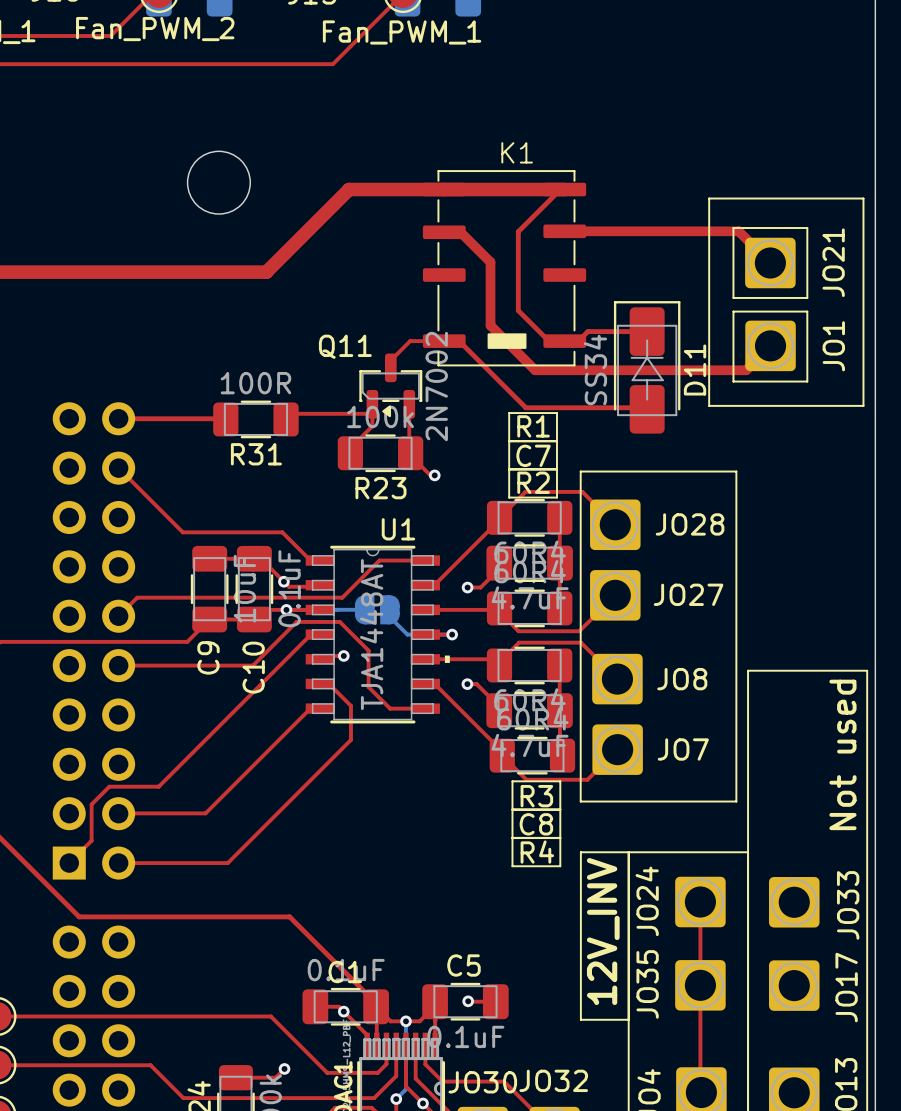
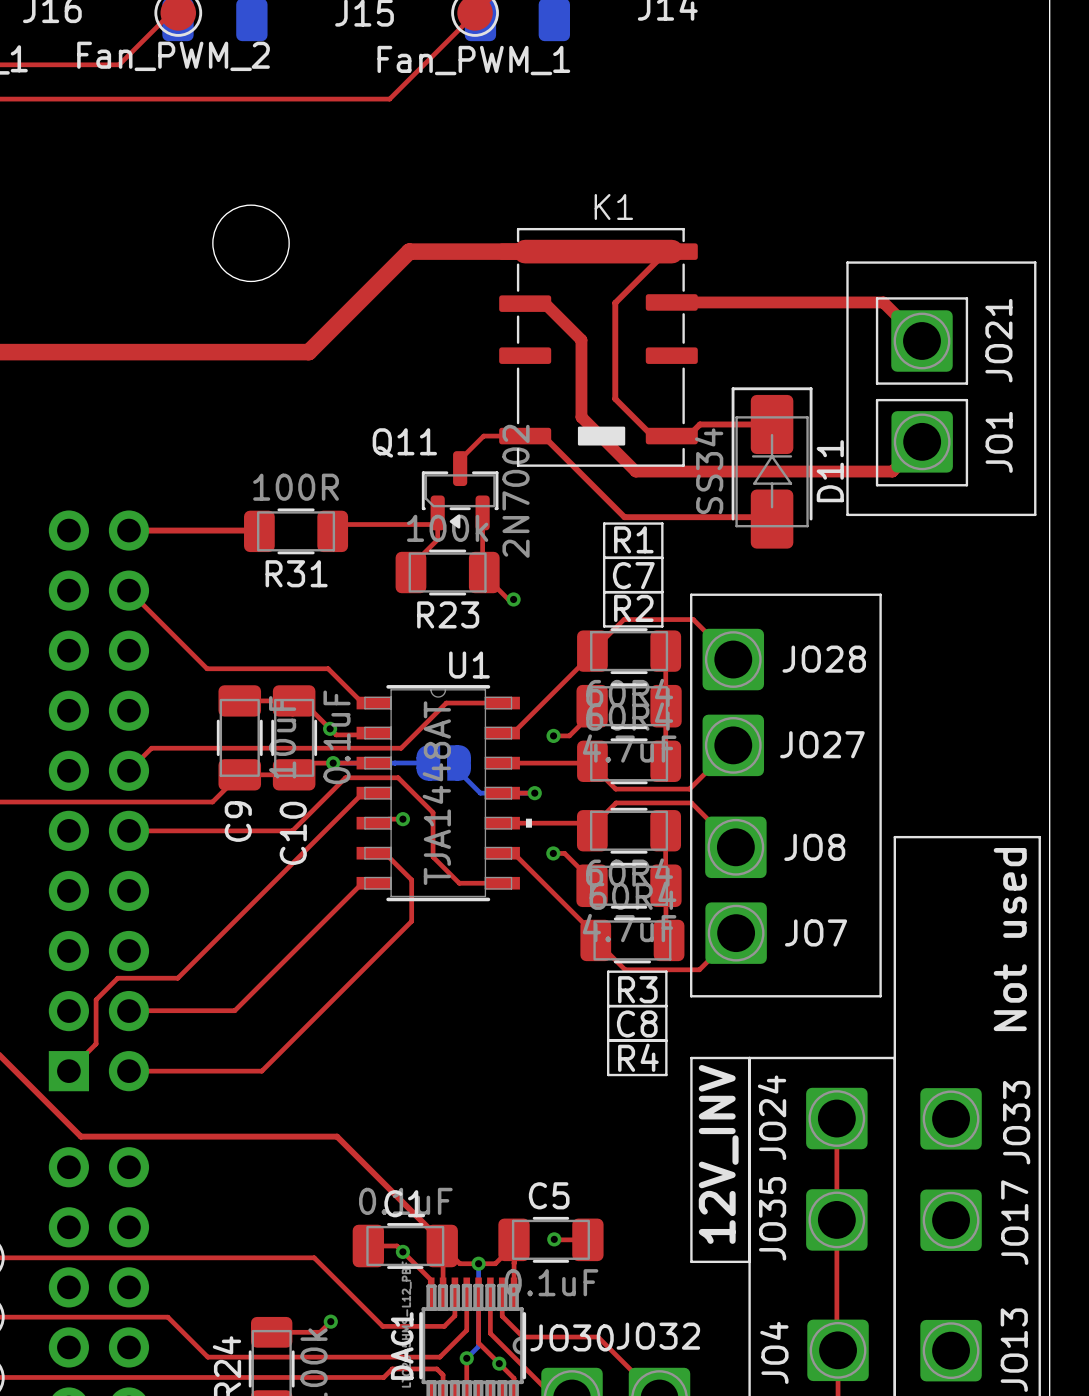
top track width: thin (444, 189) (564, 189) -> thick (525, 251) (671, 251)

